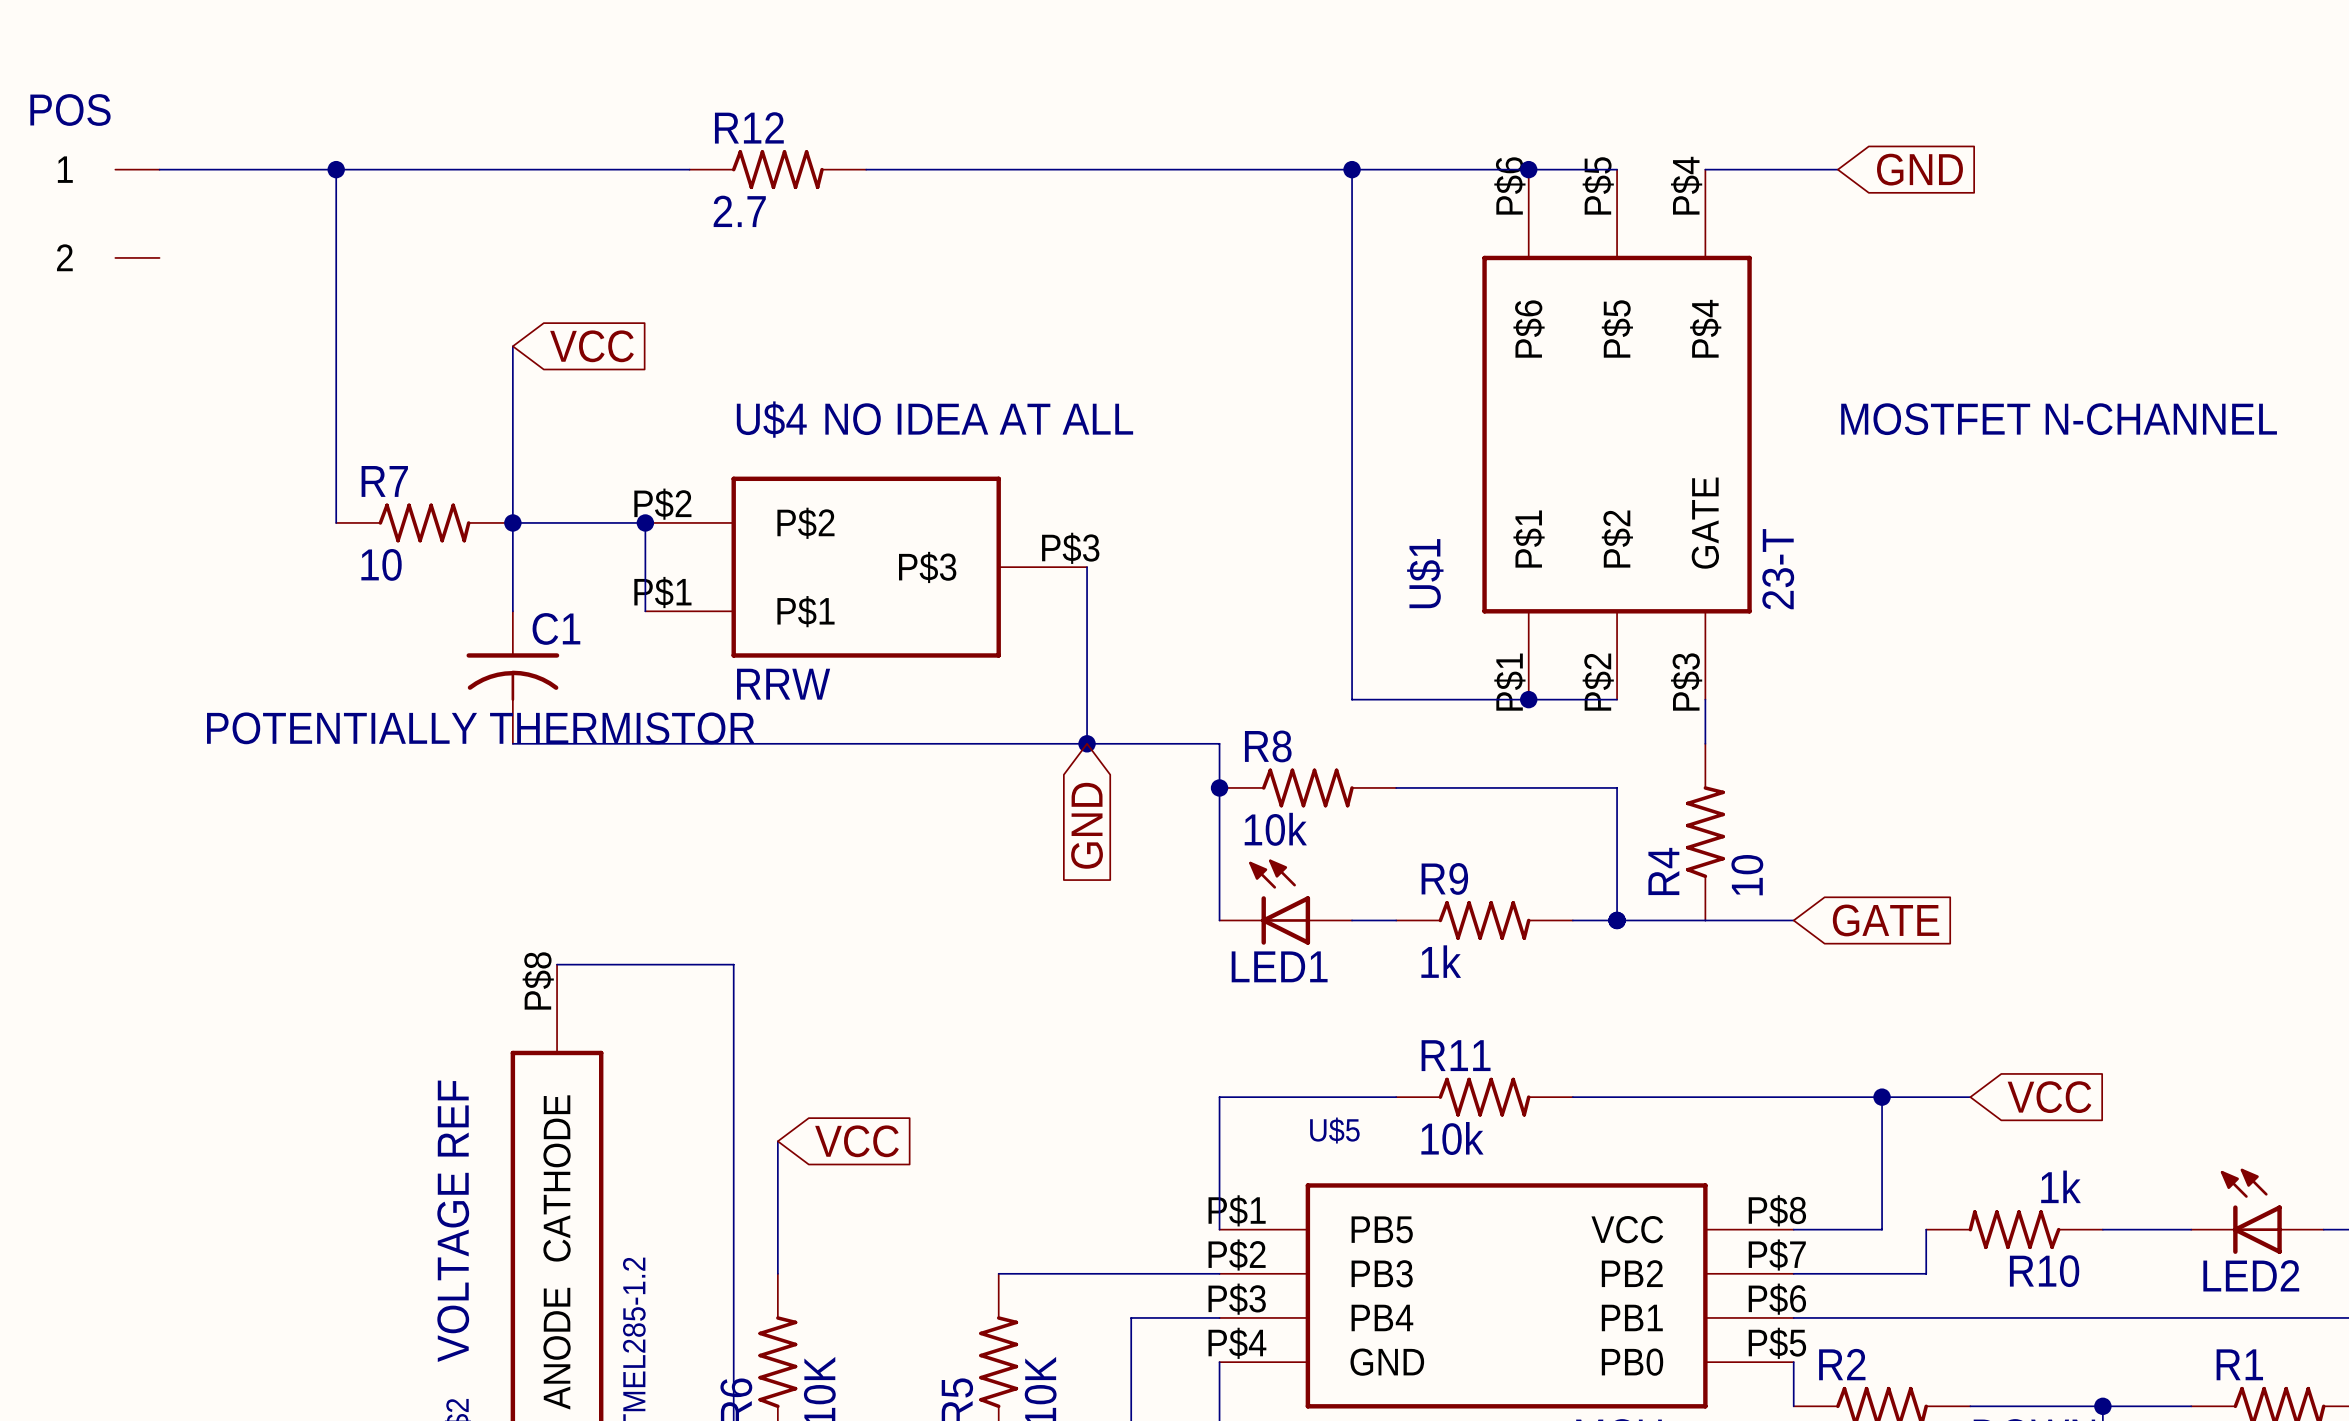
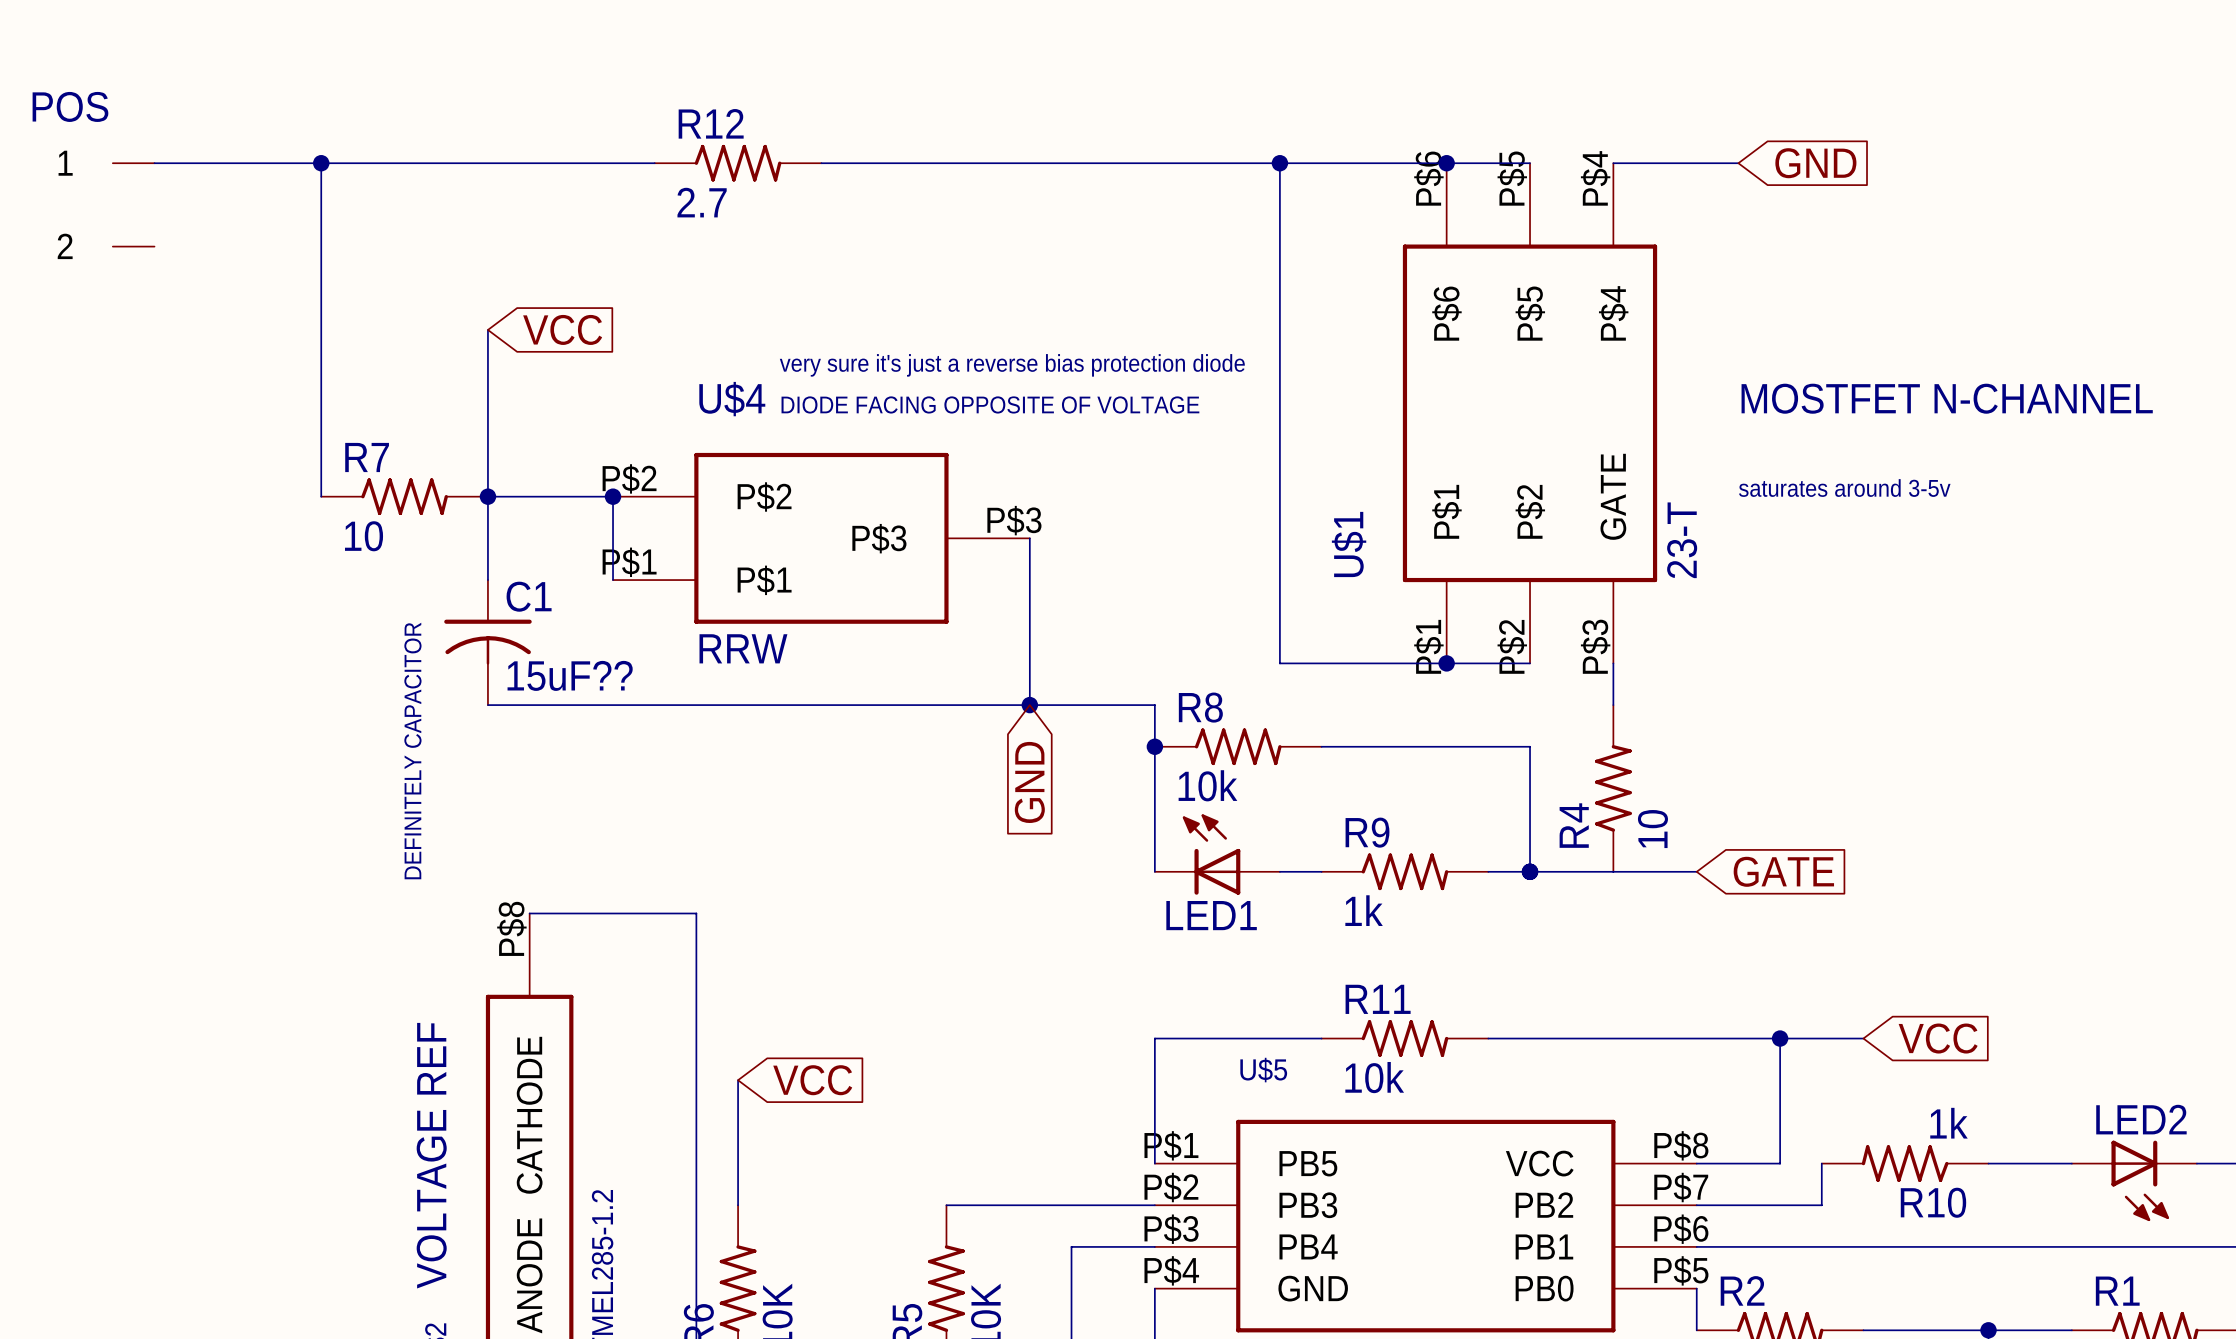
text: none -> very sure it's just a reverse bias protection diode (1012, 365)
text: NO IDEA AT ALL (979, 419) -> DIODE FACING OPPOSITE OF VOLTAGE (990, 404)
text: none -> saturates around 3-5v (1844, 488)
C1 value: none -> 15uF?? (570, 675)
text: POTENTIALLY THERMISTOR (480, 728) -> none
text: none -> DEFINITELY CAPACITOR (412, 751)
LED2 rotation: 0° (2251, 1211) -> 180° (2140, 1180)

